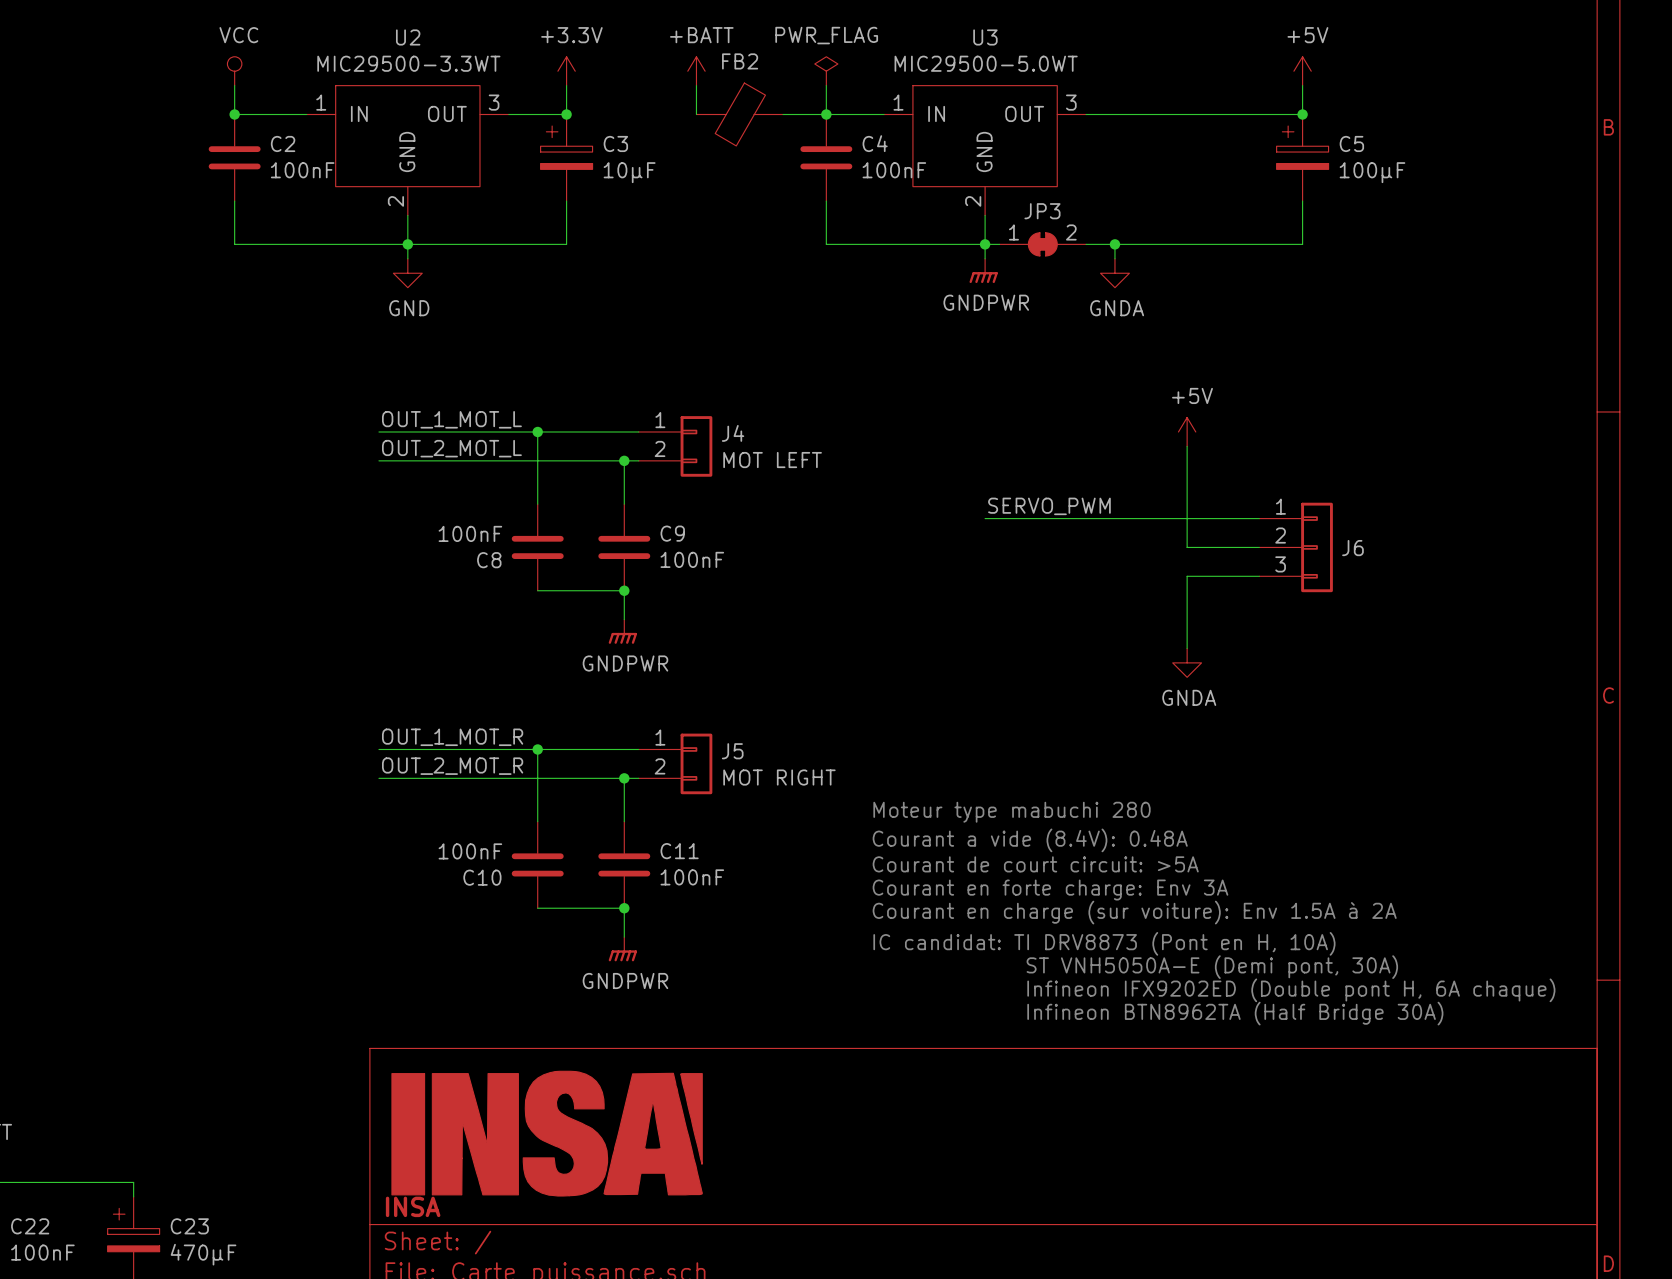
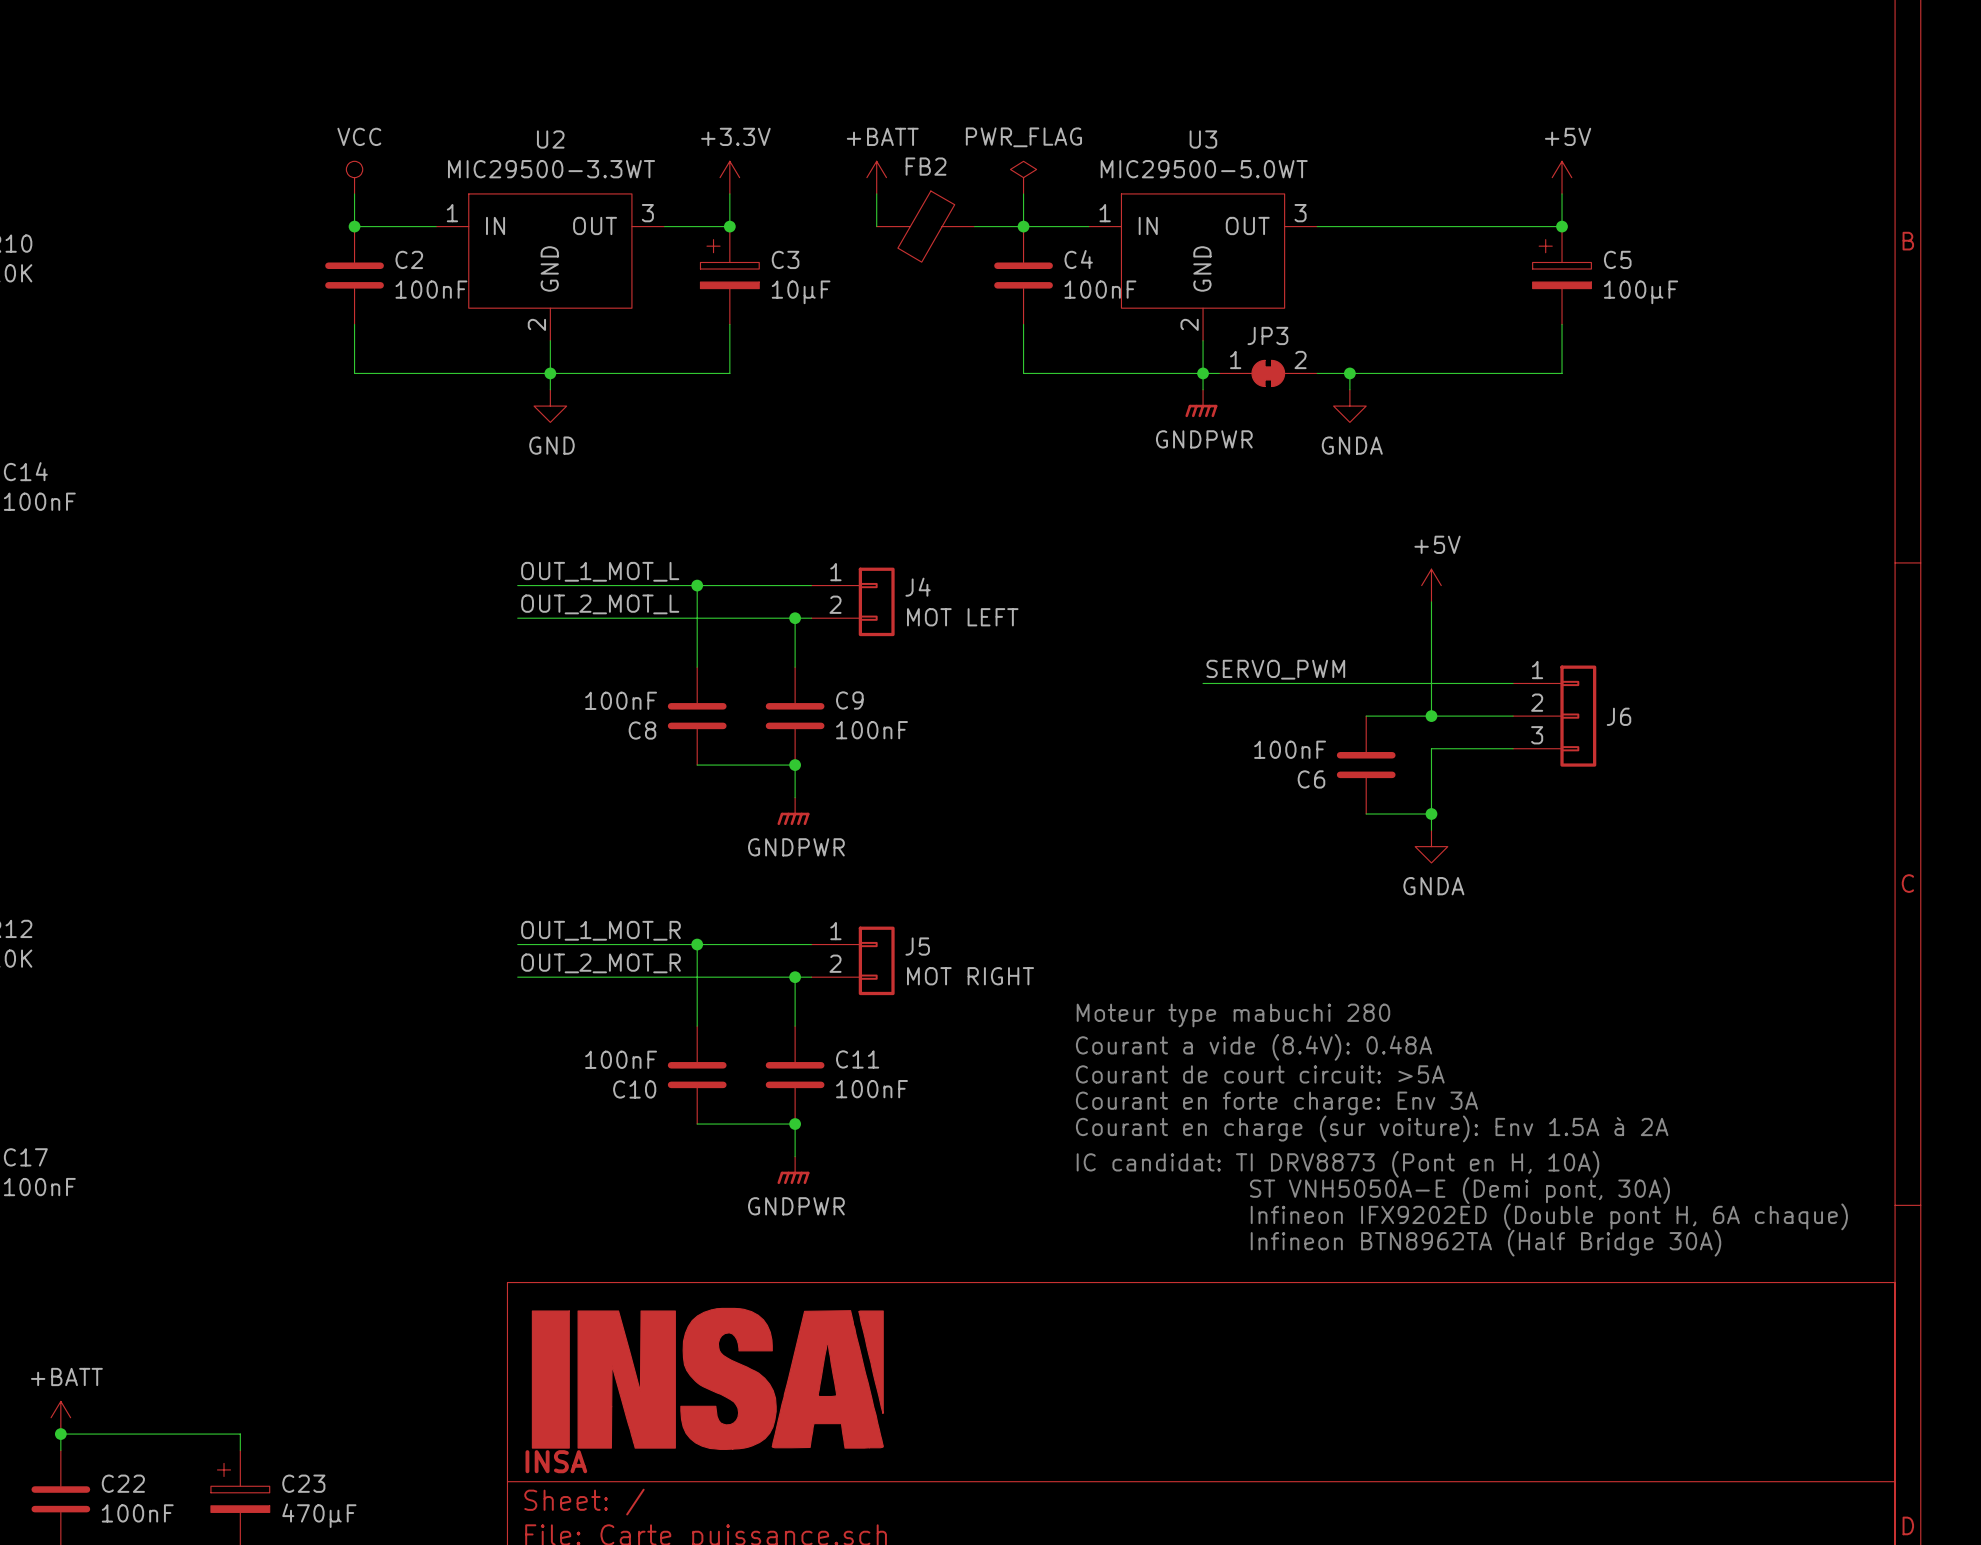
wire: none -> (1366, 716) (1431, 716)
junction: none -> (1431, 716)
C6: none -> 100nF (1366, 765)
wire: none -> (1366, 814) (1431, 814)
junction: none -> (1431, 814)

